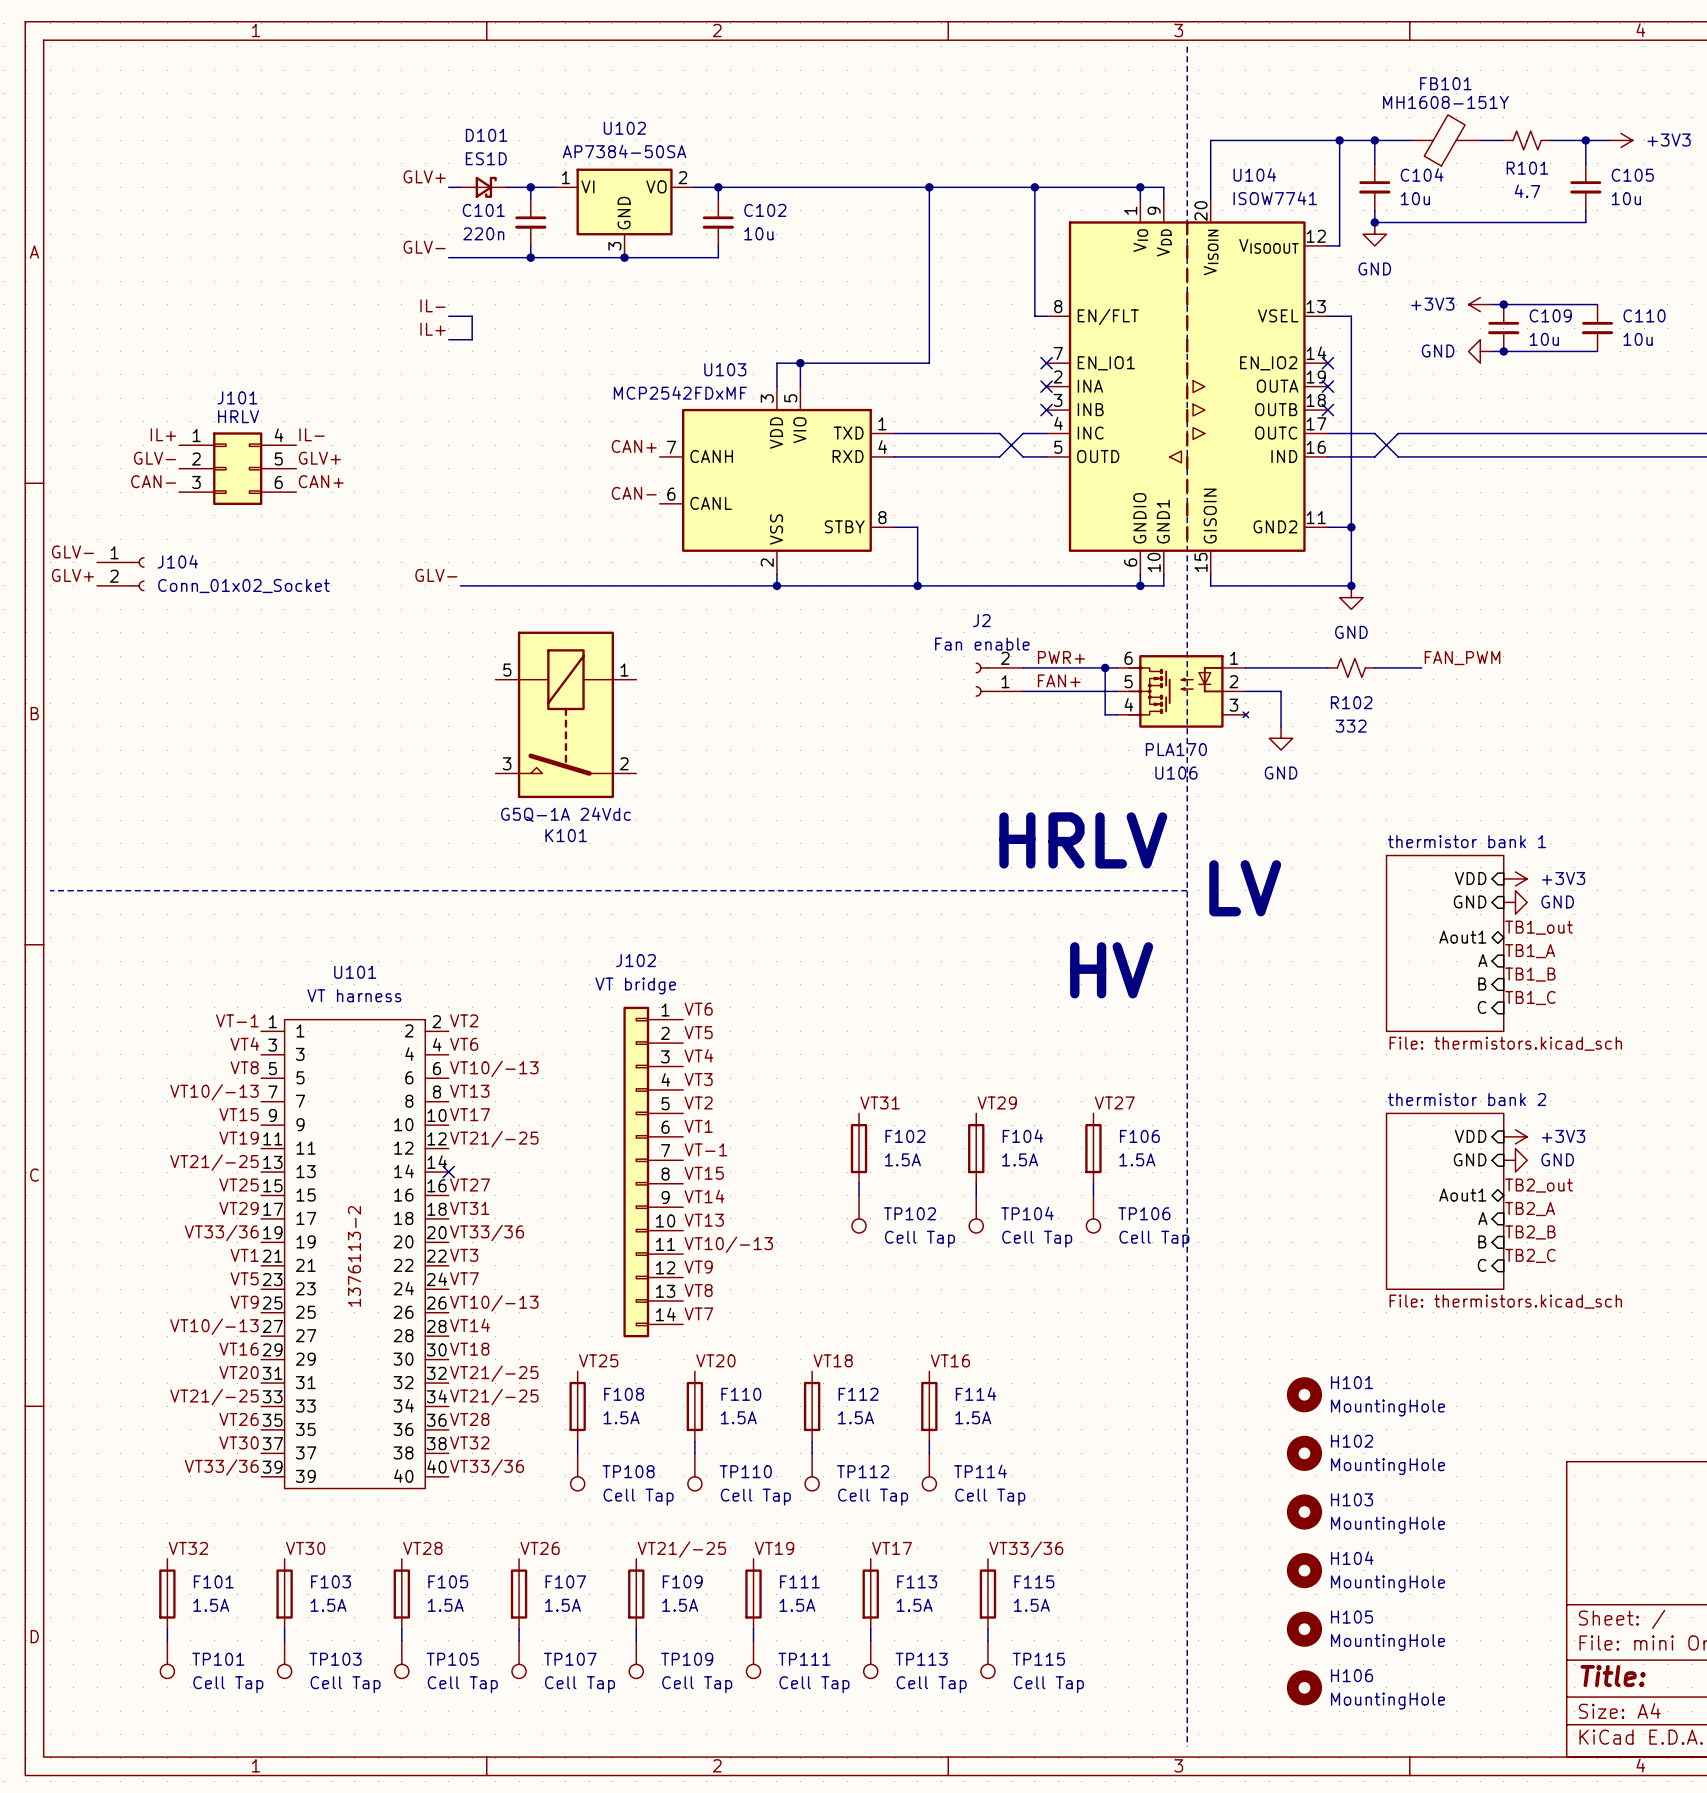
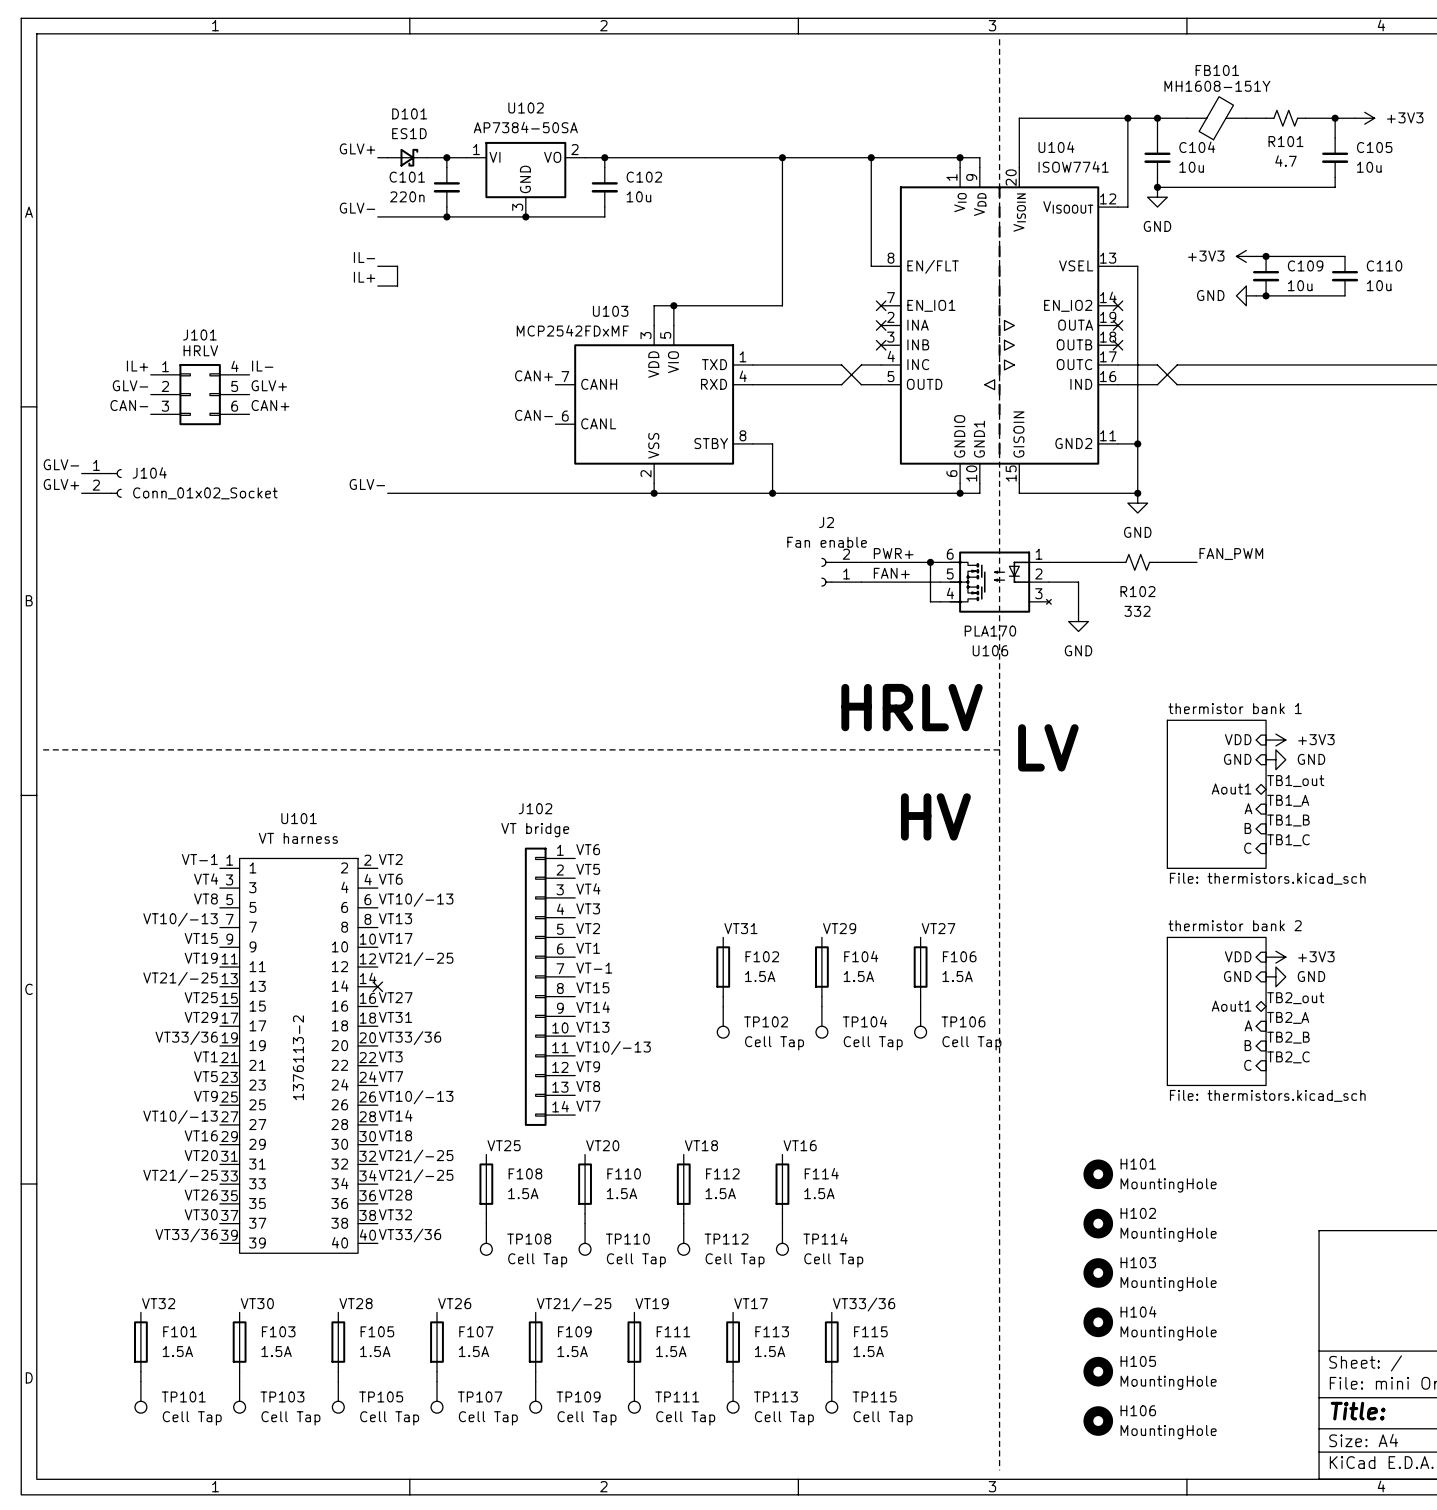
K101: G5Q-1A 24Vdc (565, 714) -> none

